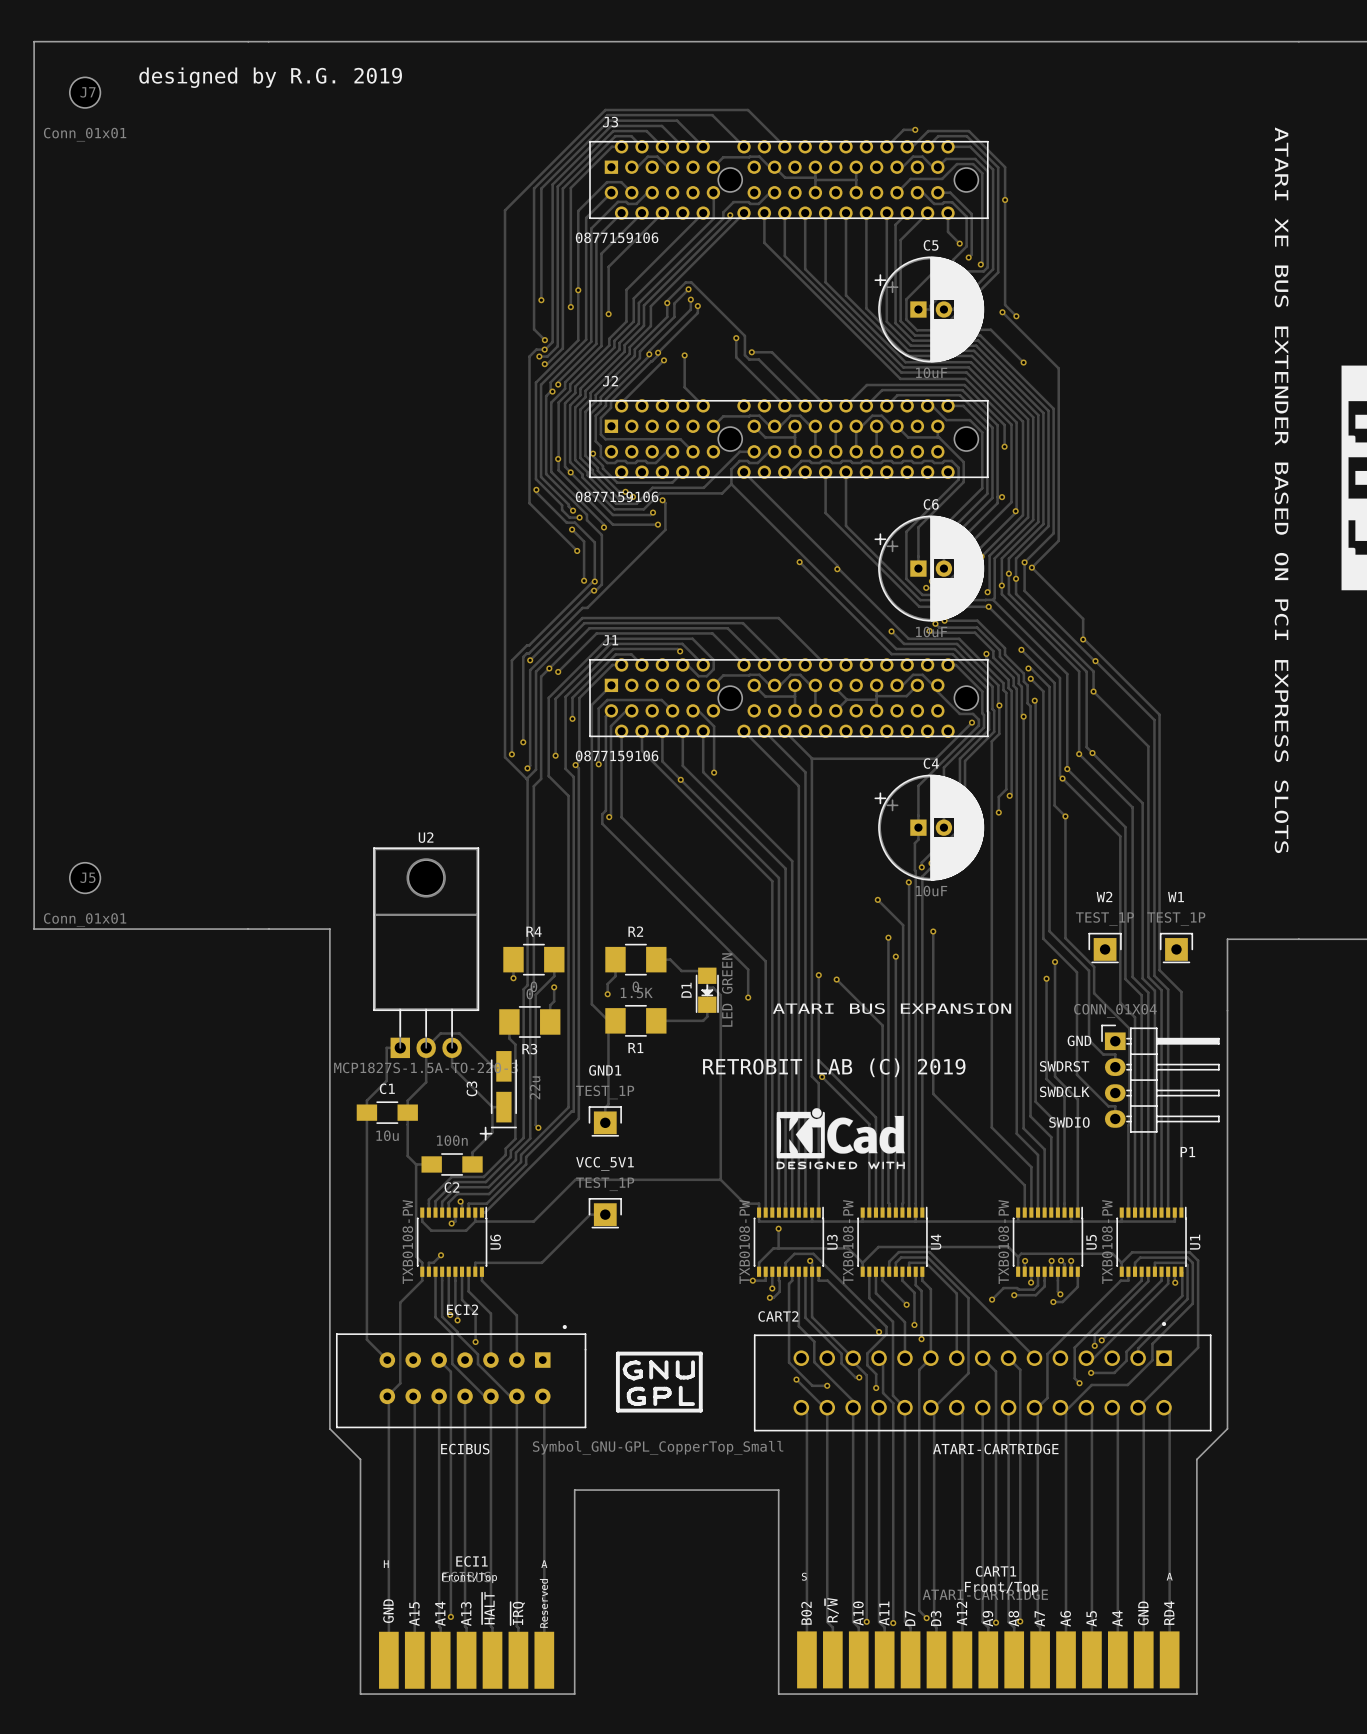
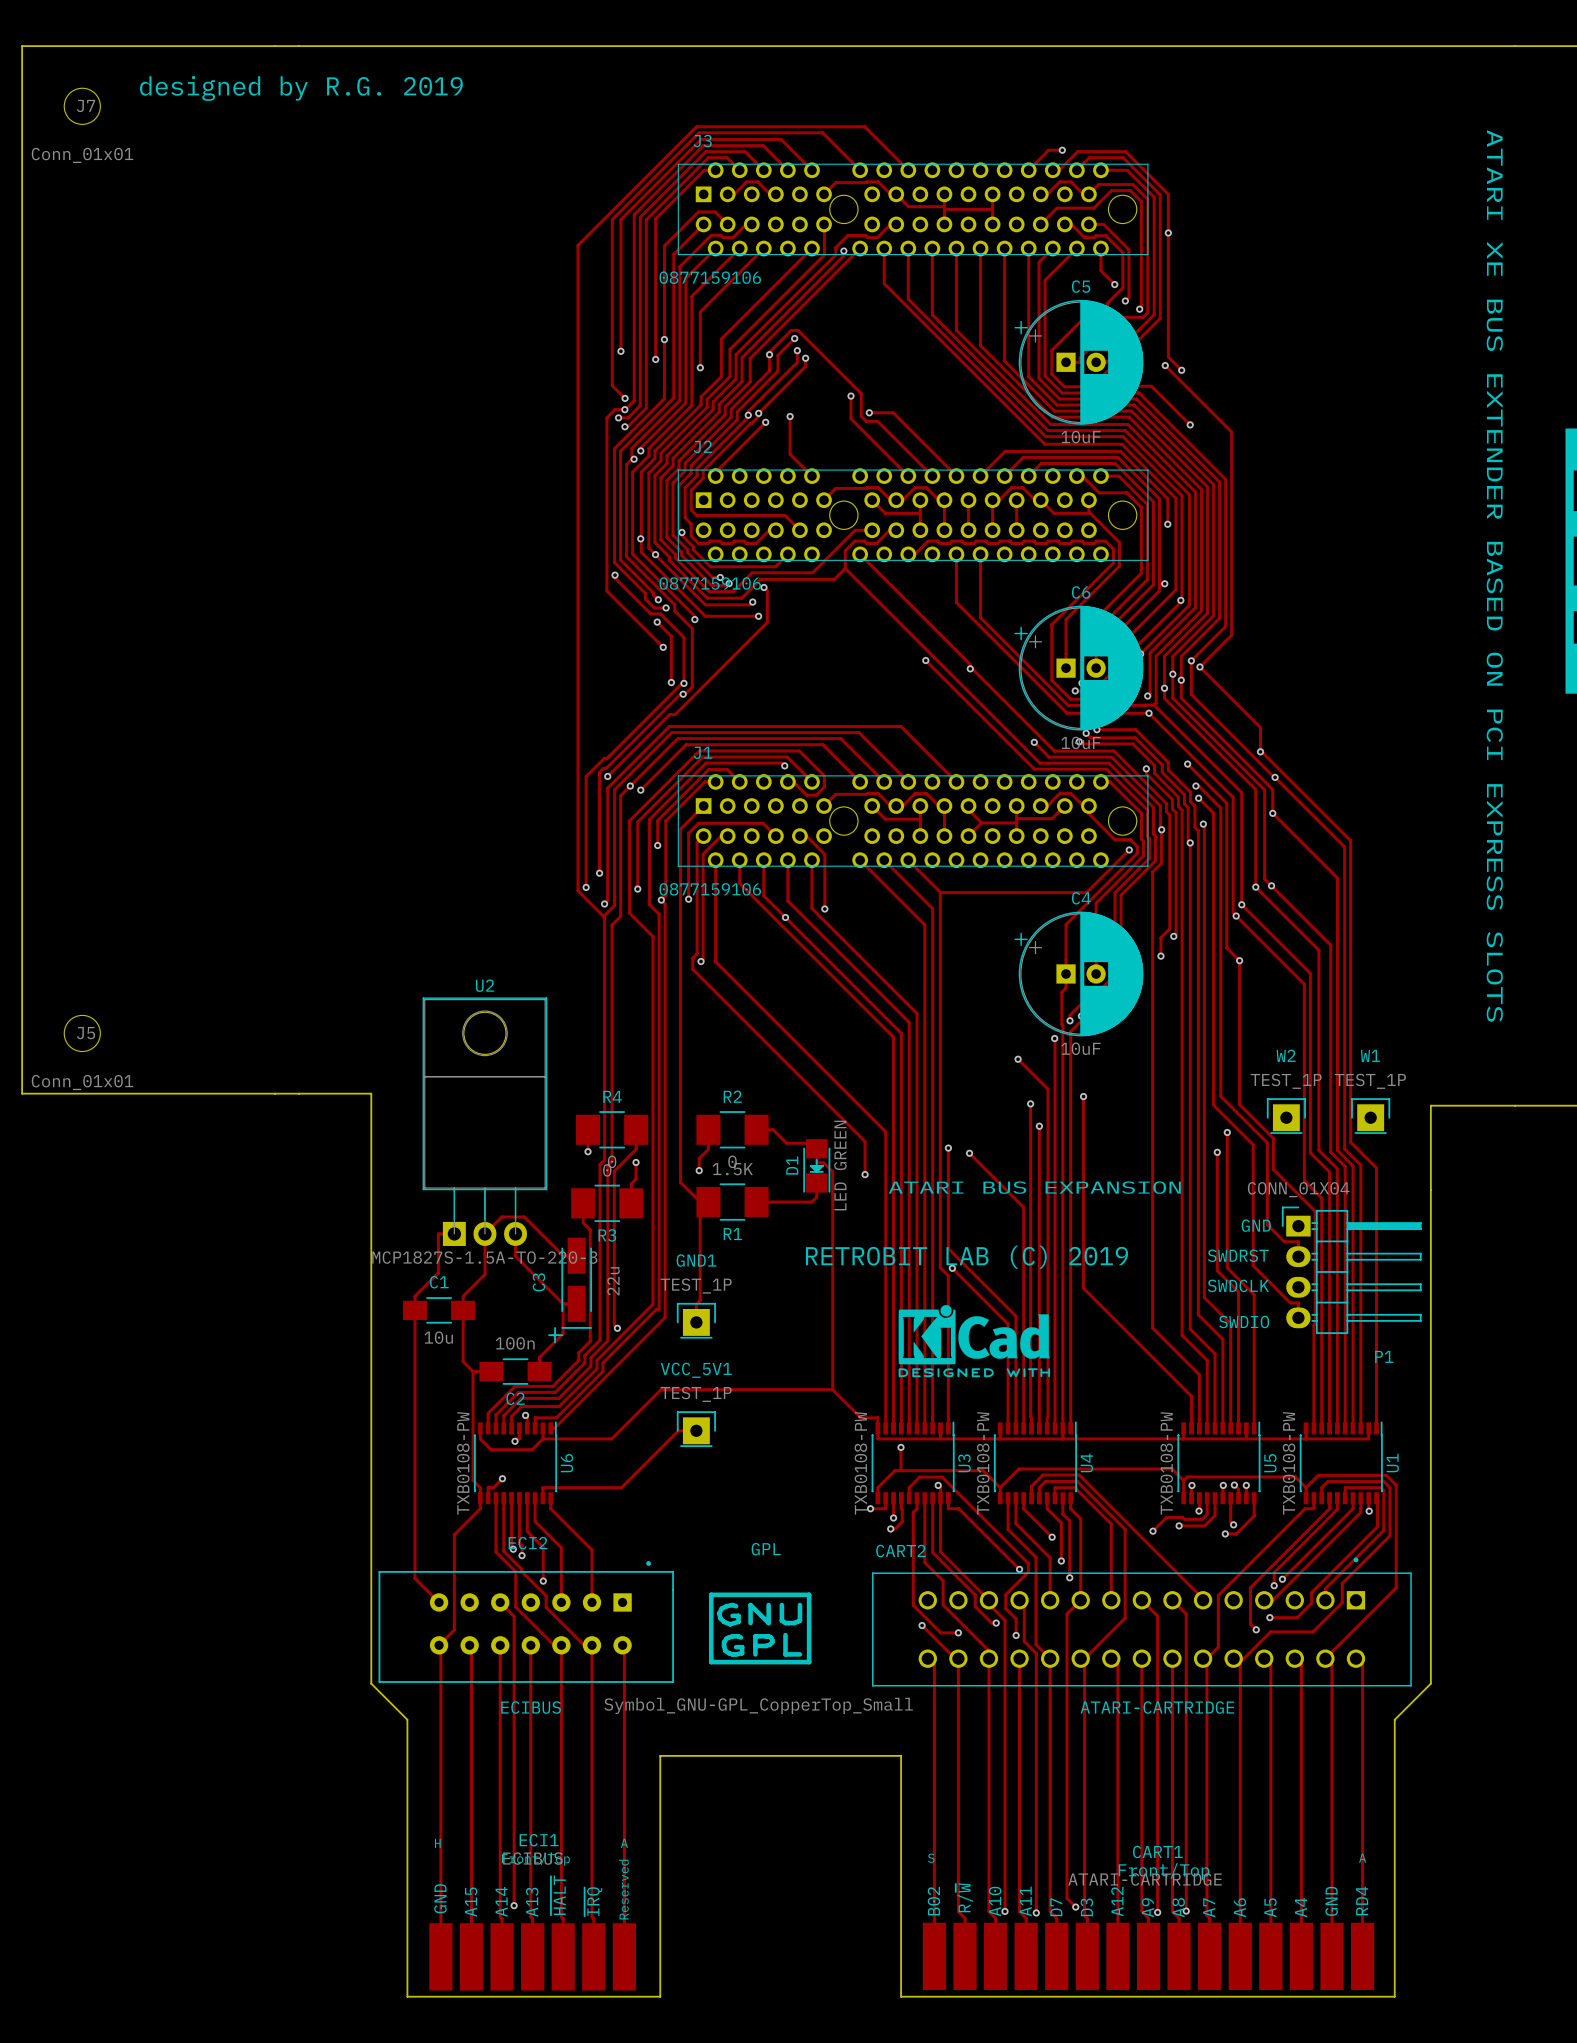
GPL: none -> Symbol_GNU-GPL_CopperTop_Small (760, 1628)

